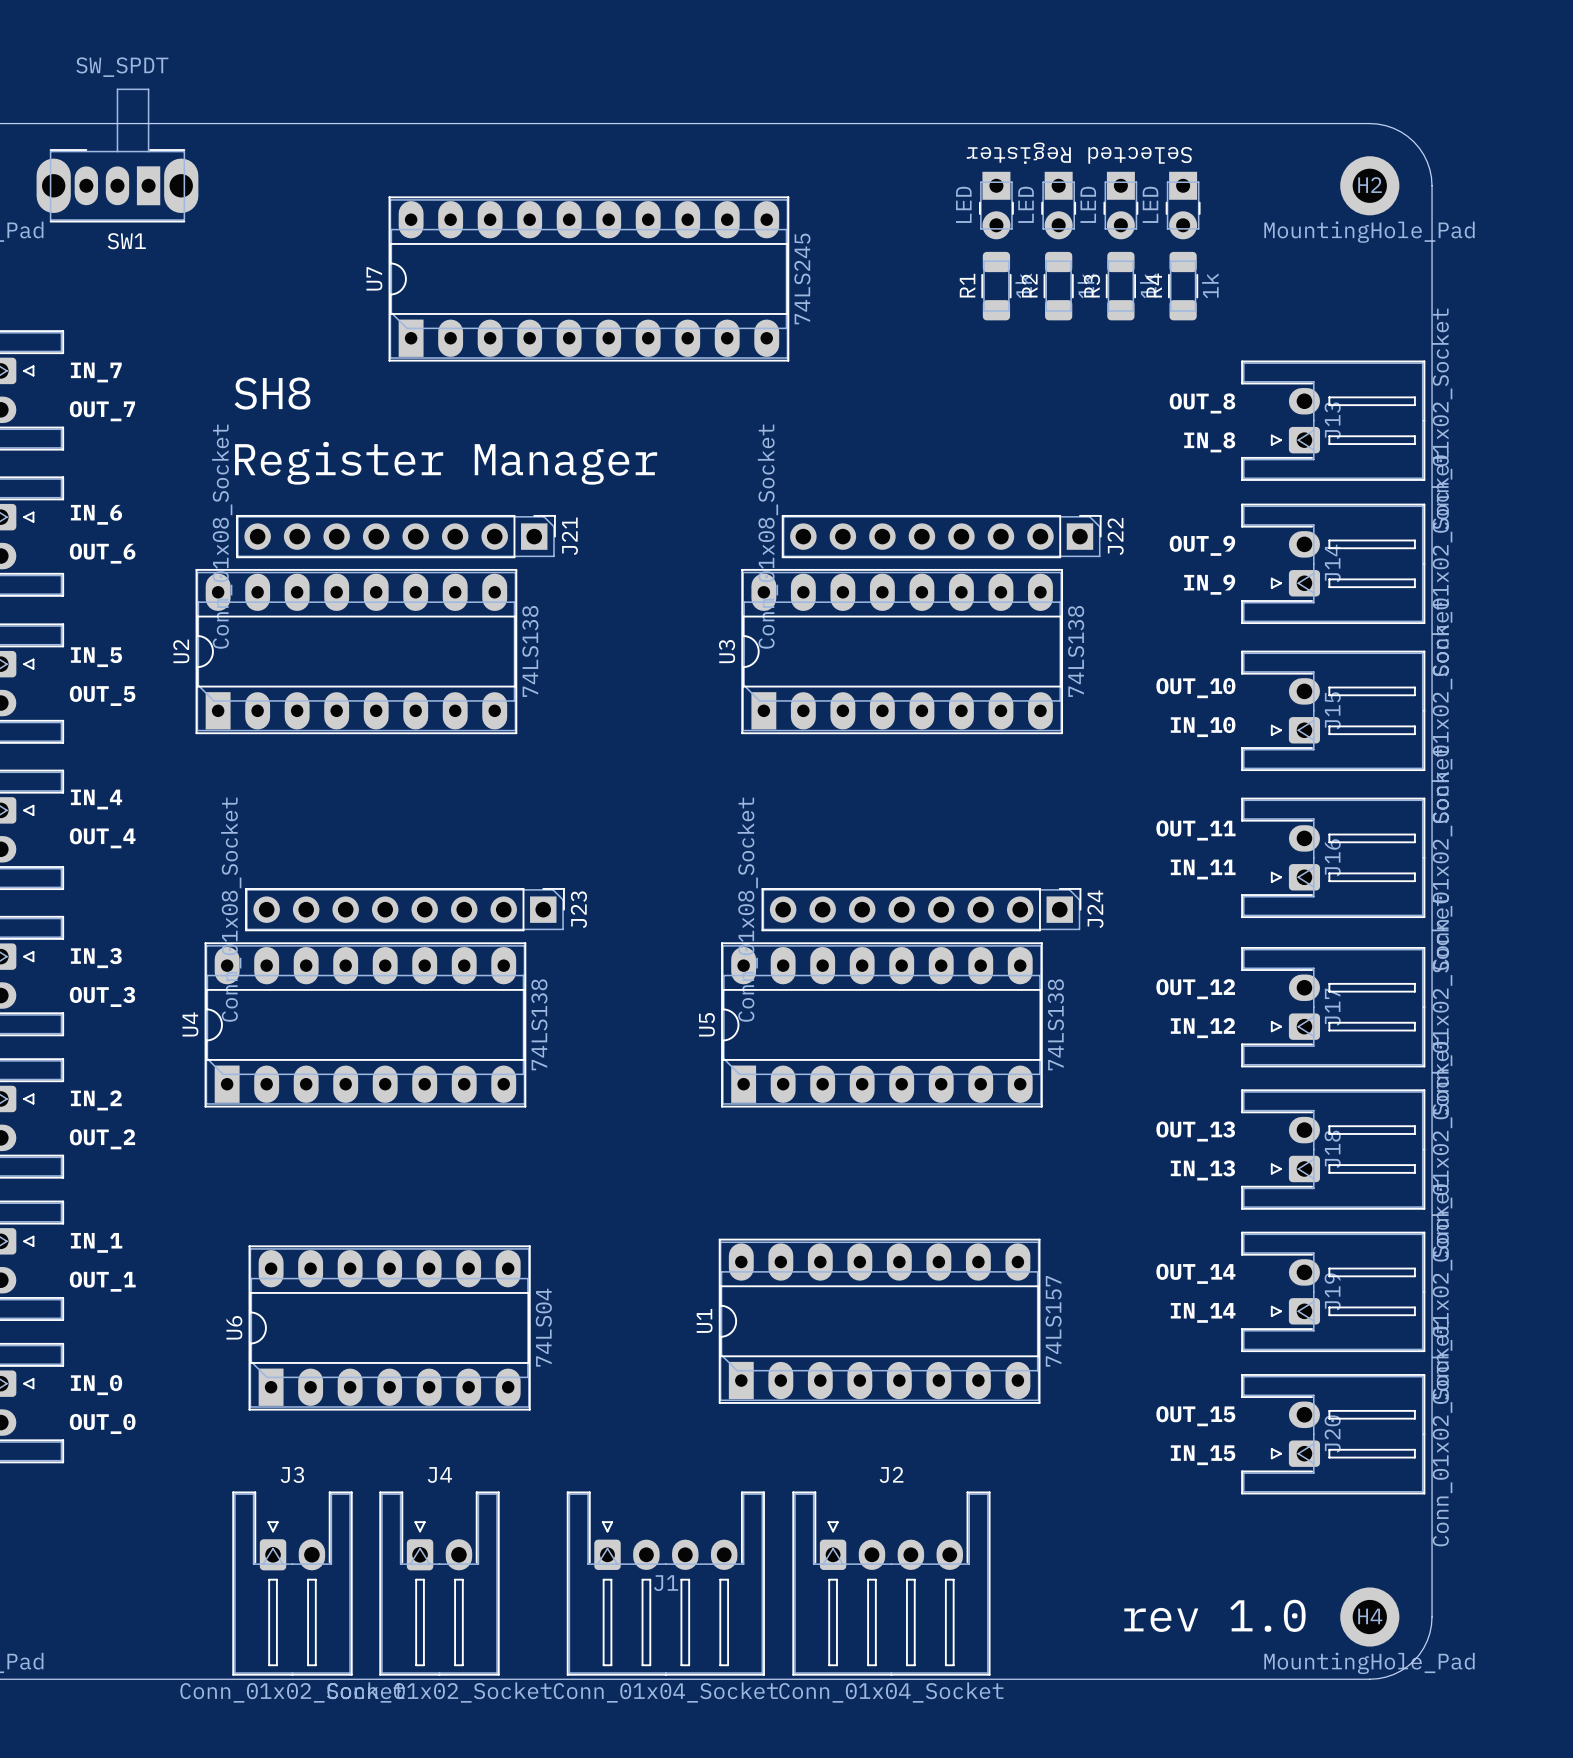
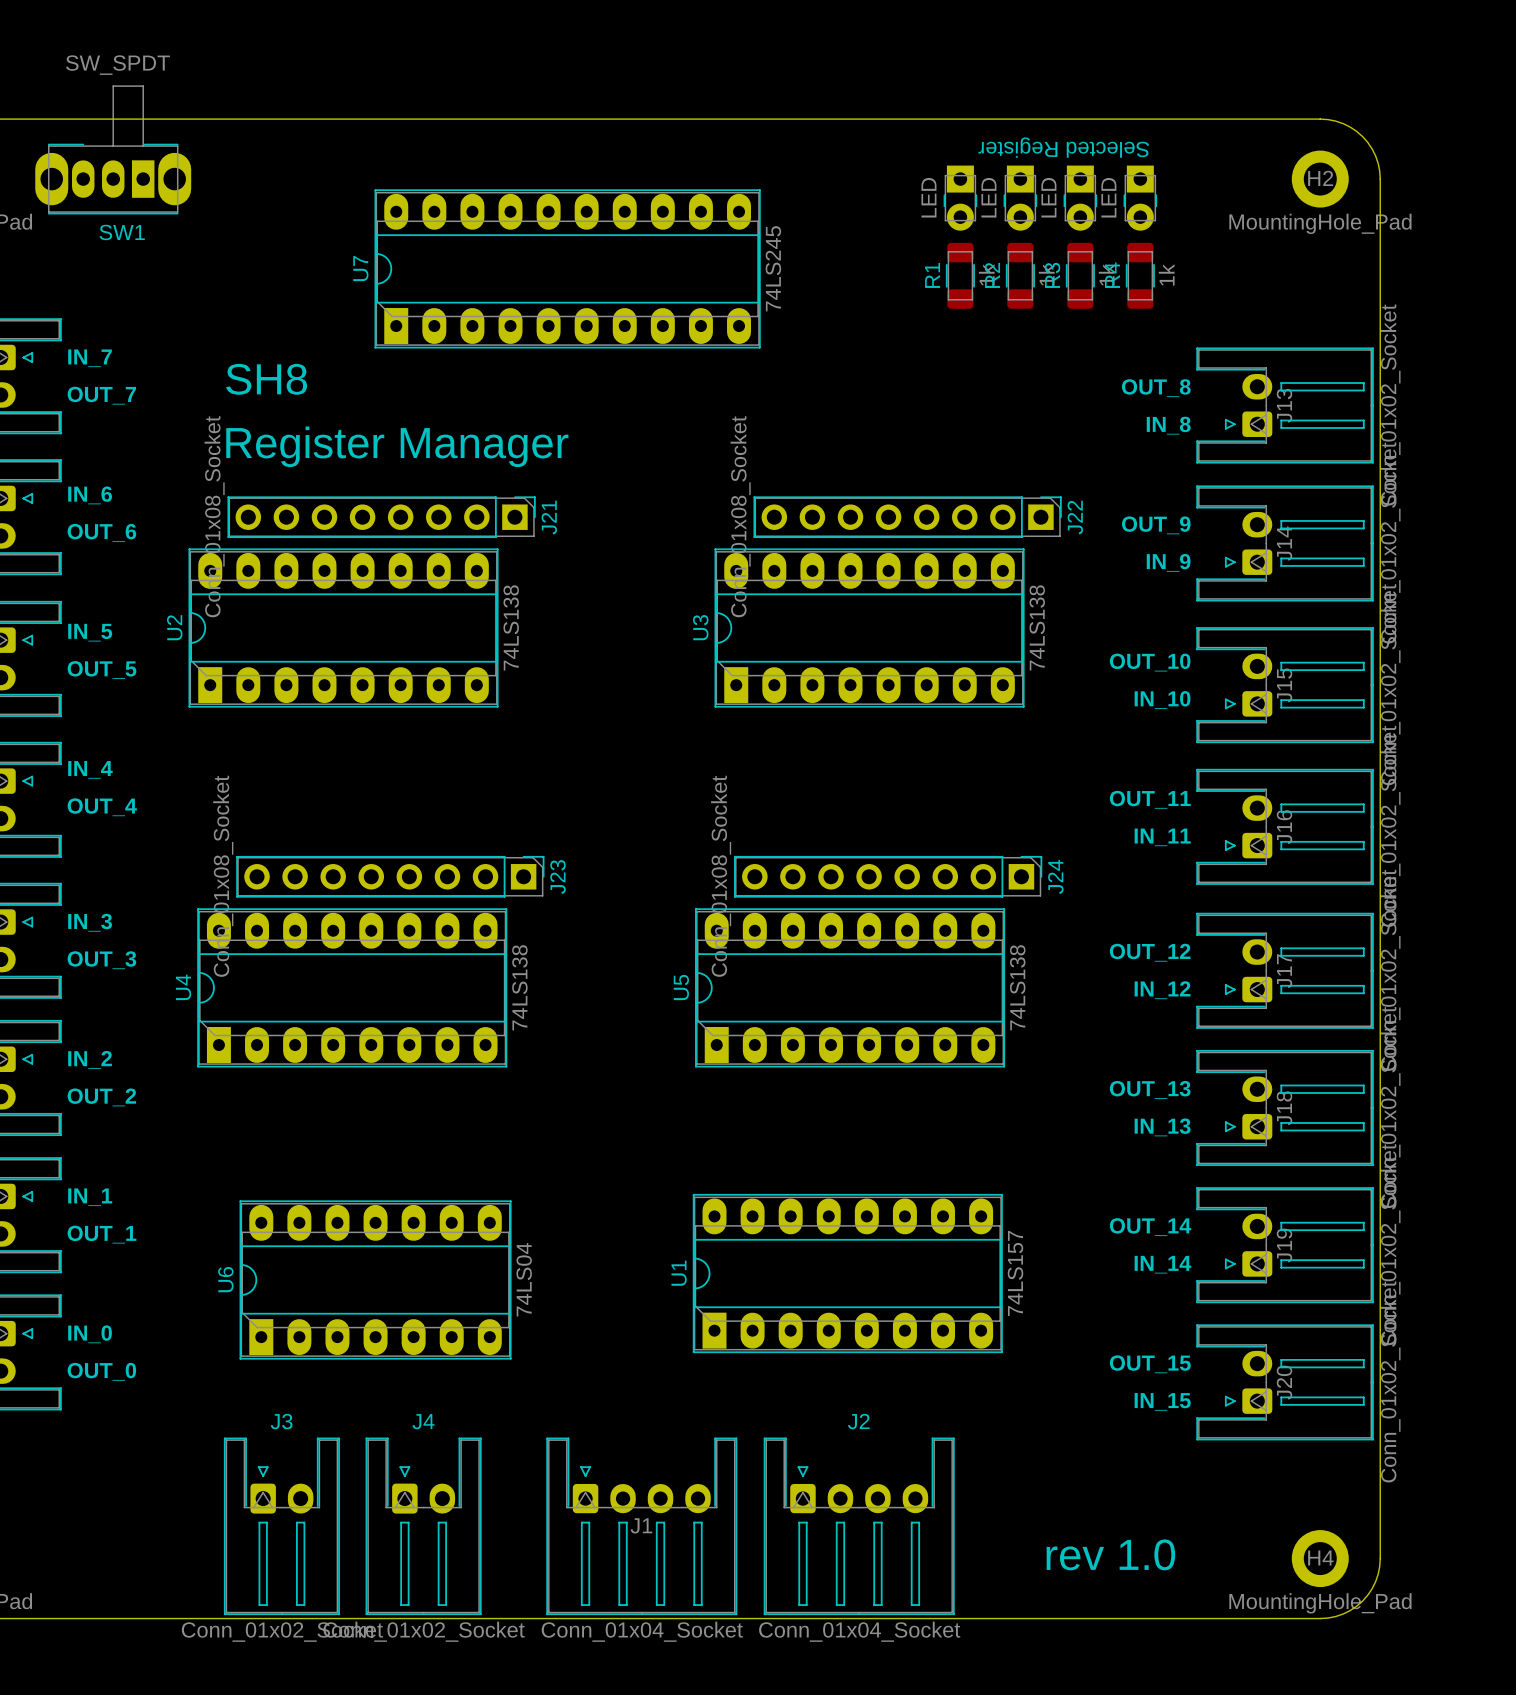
text position: rev 1.0 (1214, 1615) -> rev 1.0 (1110, 1554)

